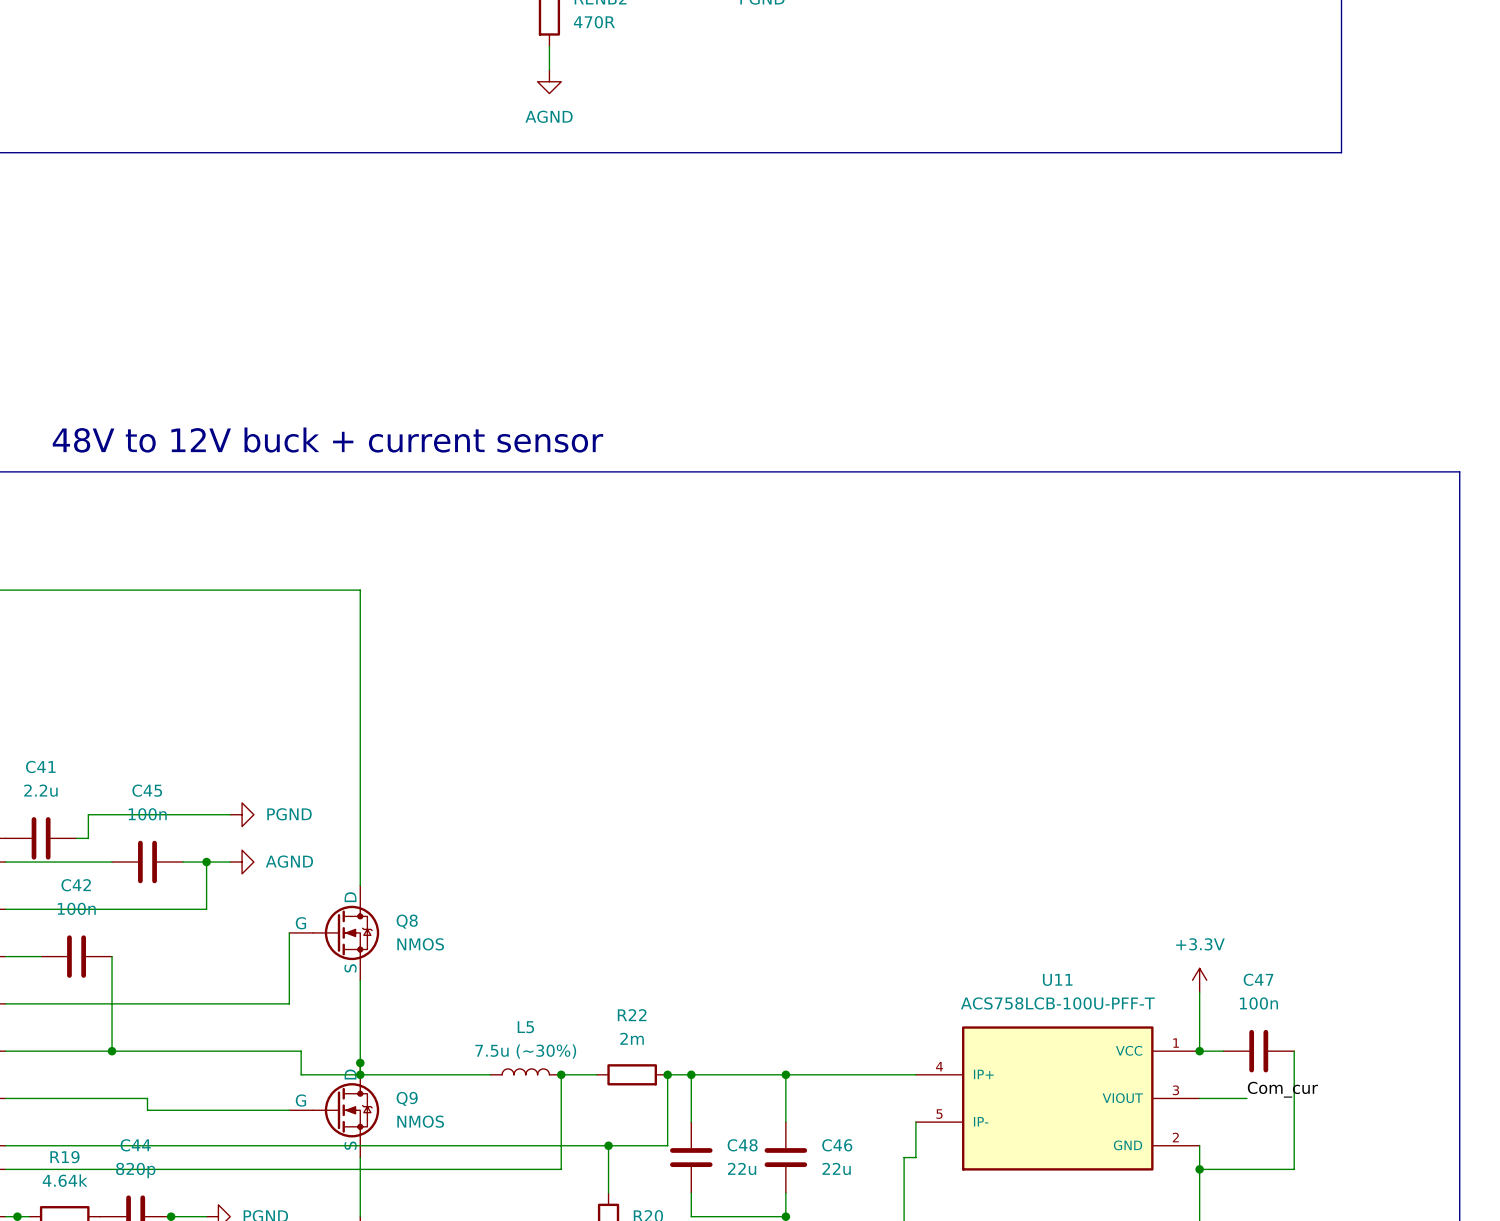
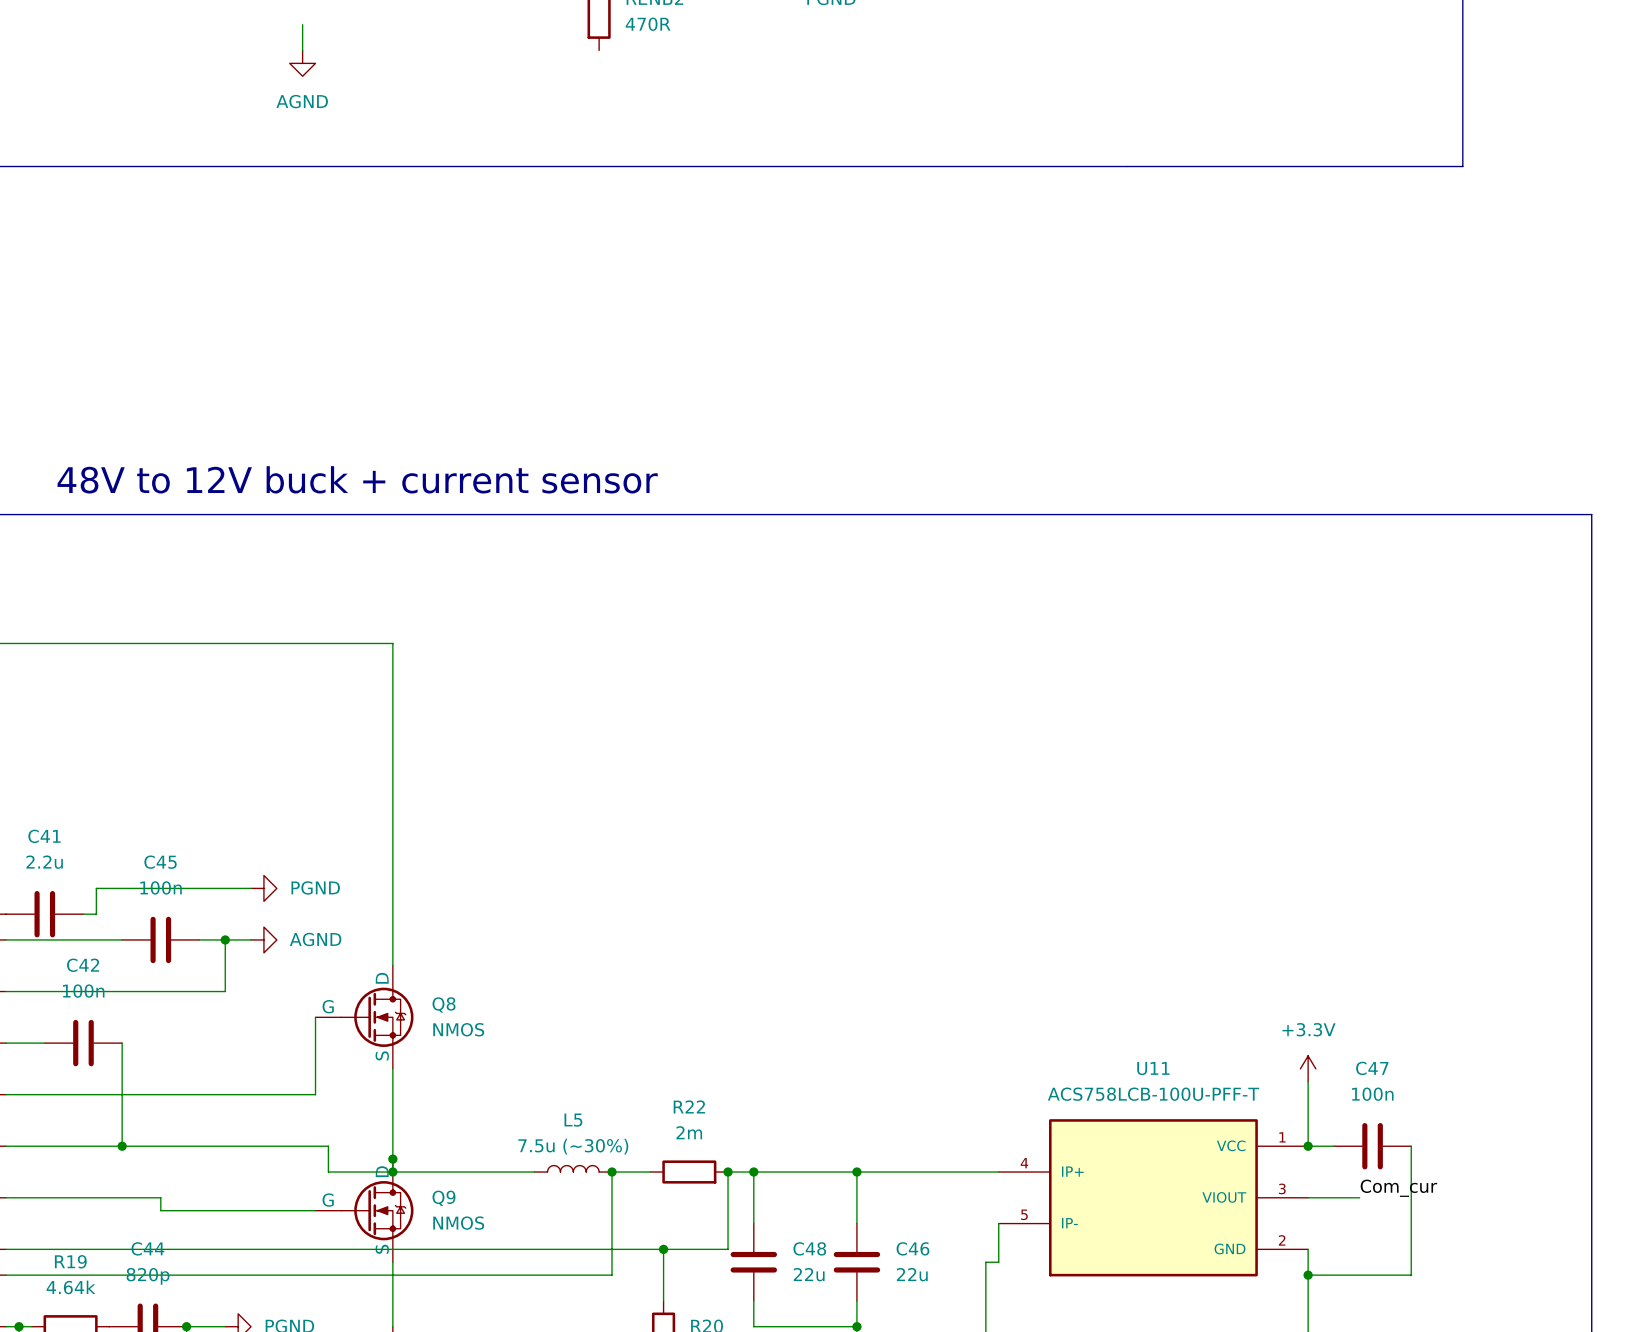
wire: none -> (302, 24) (302, 50)
wire: (549, 46) (549, 69) -> none
power symbol: none -> AGND (302, 63)
power symbol: AGND (549, 81) -> none

